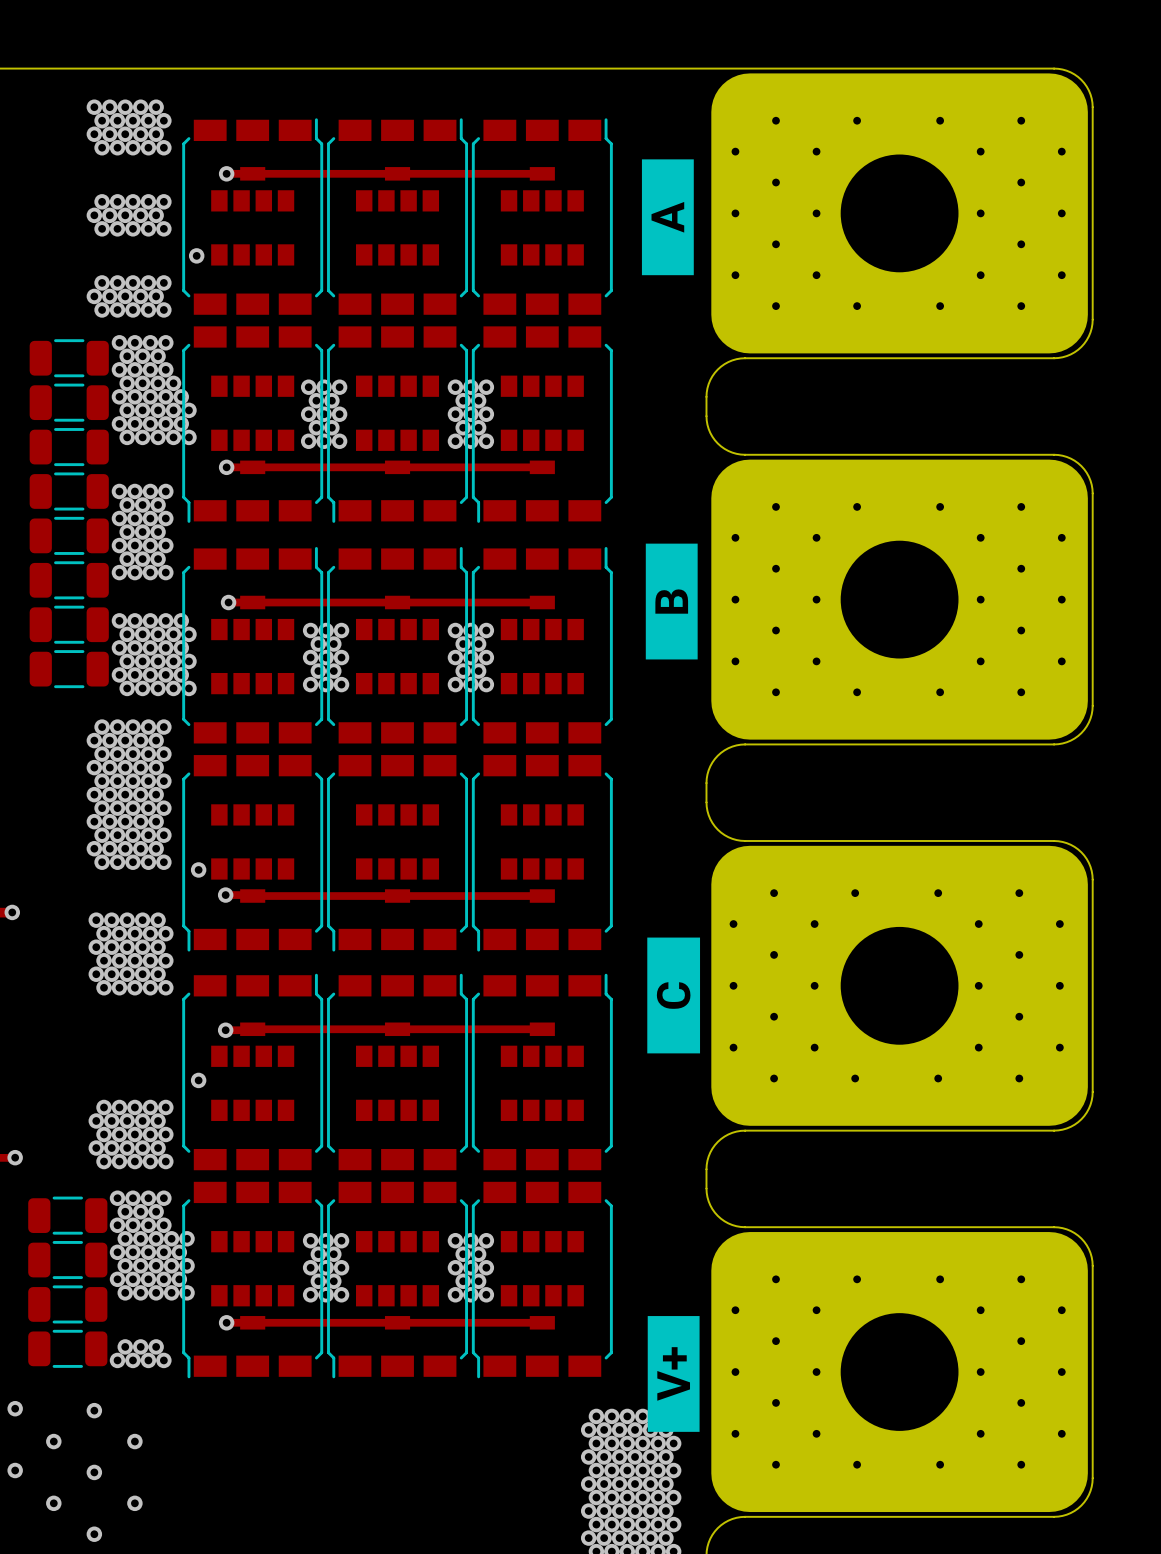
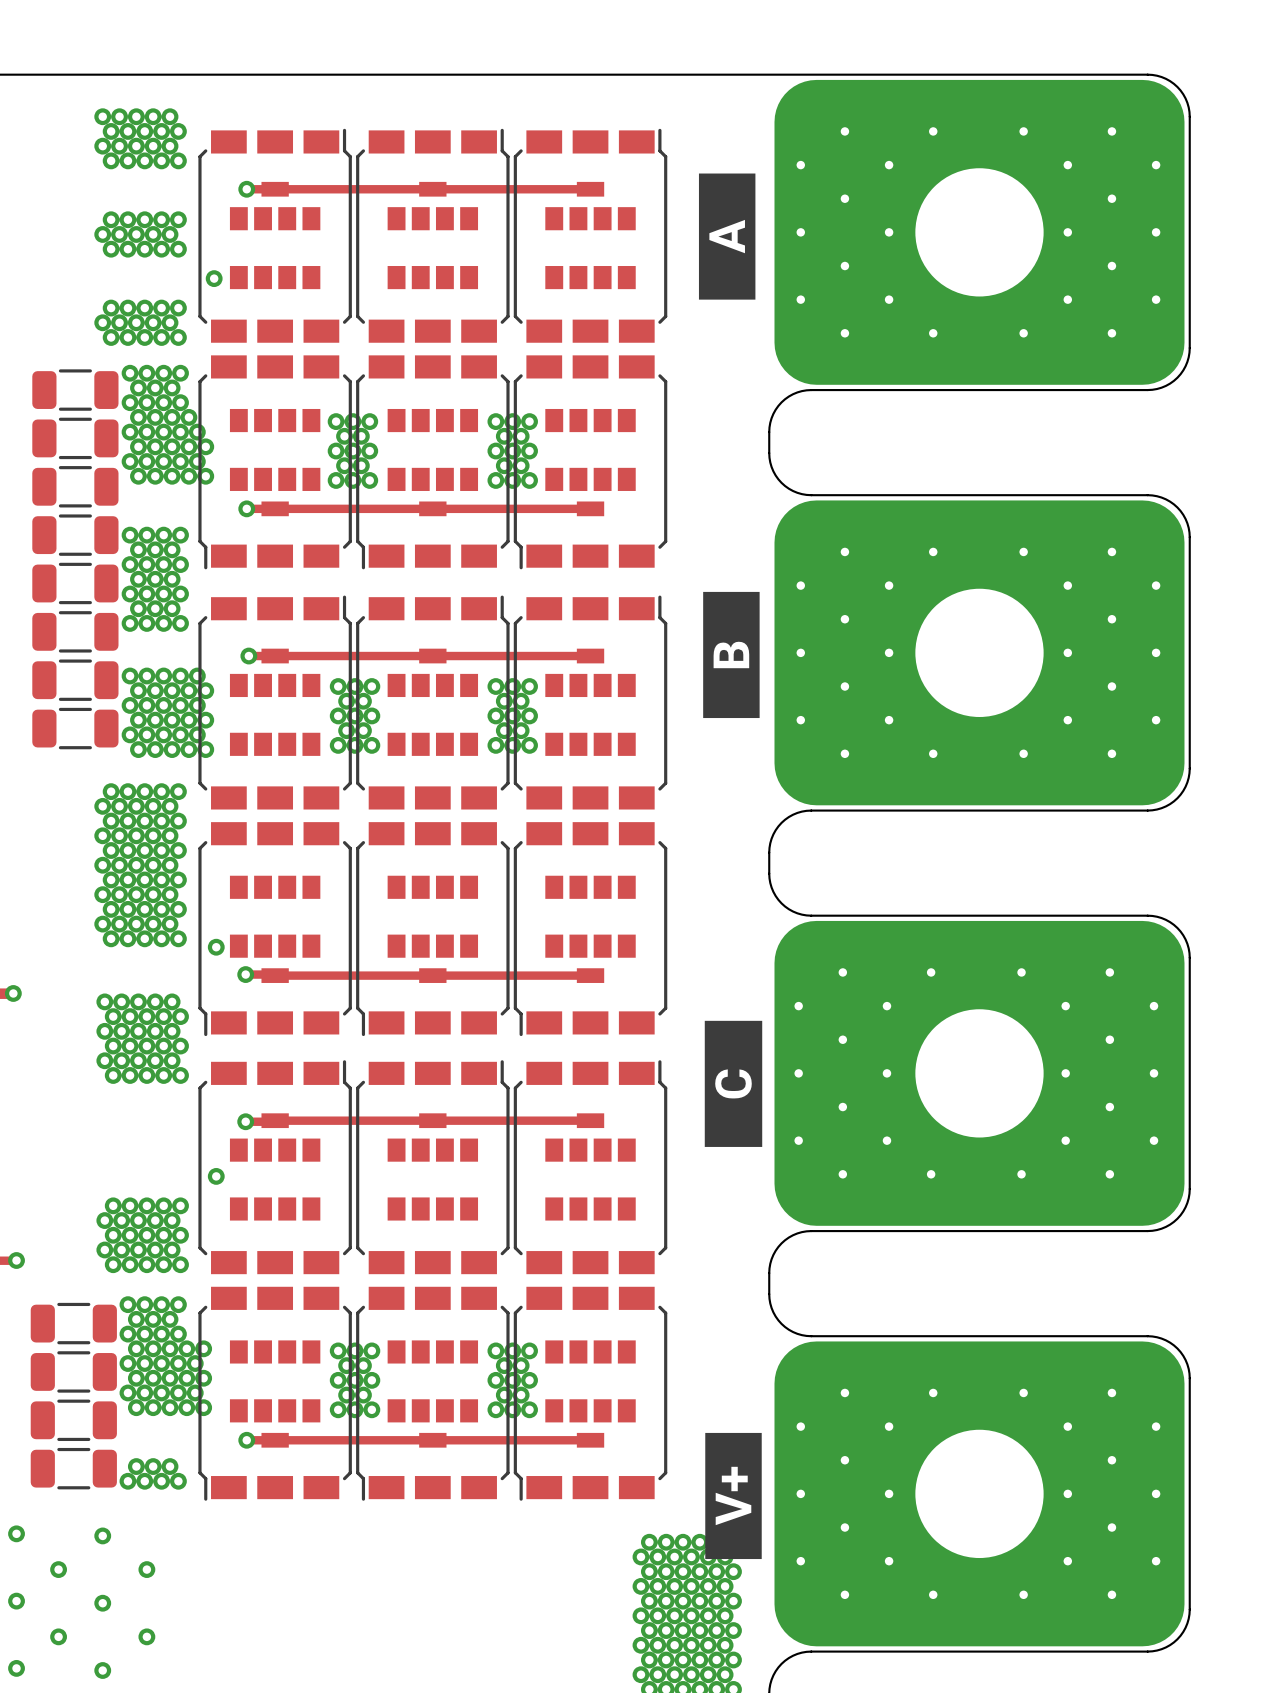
via: none -> (16, 1668)

